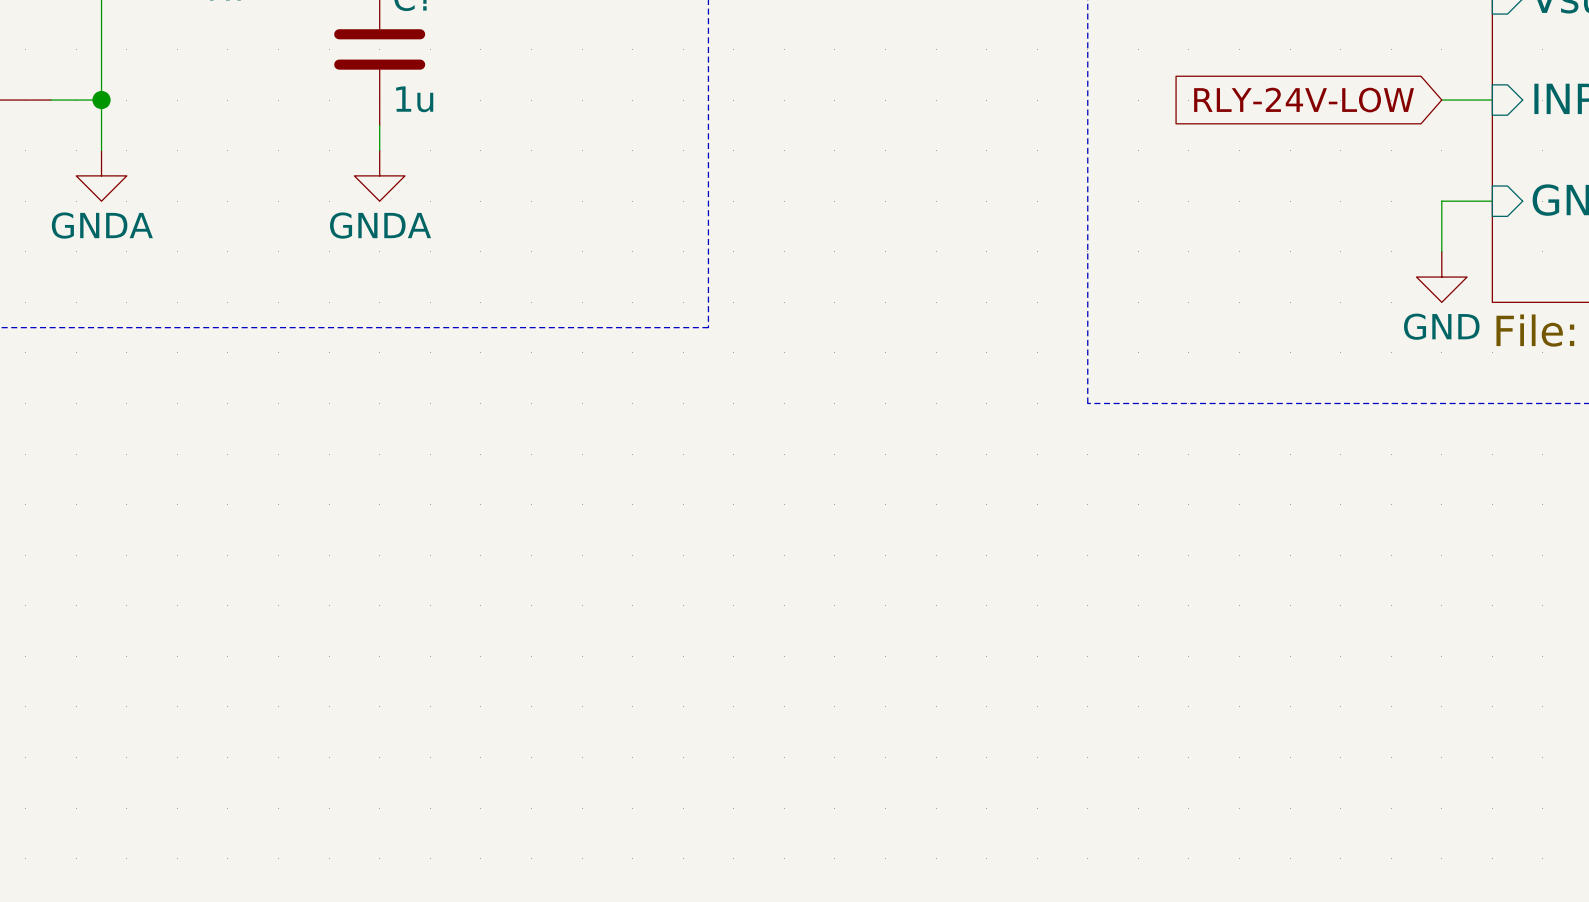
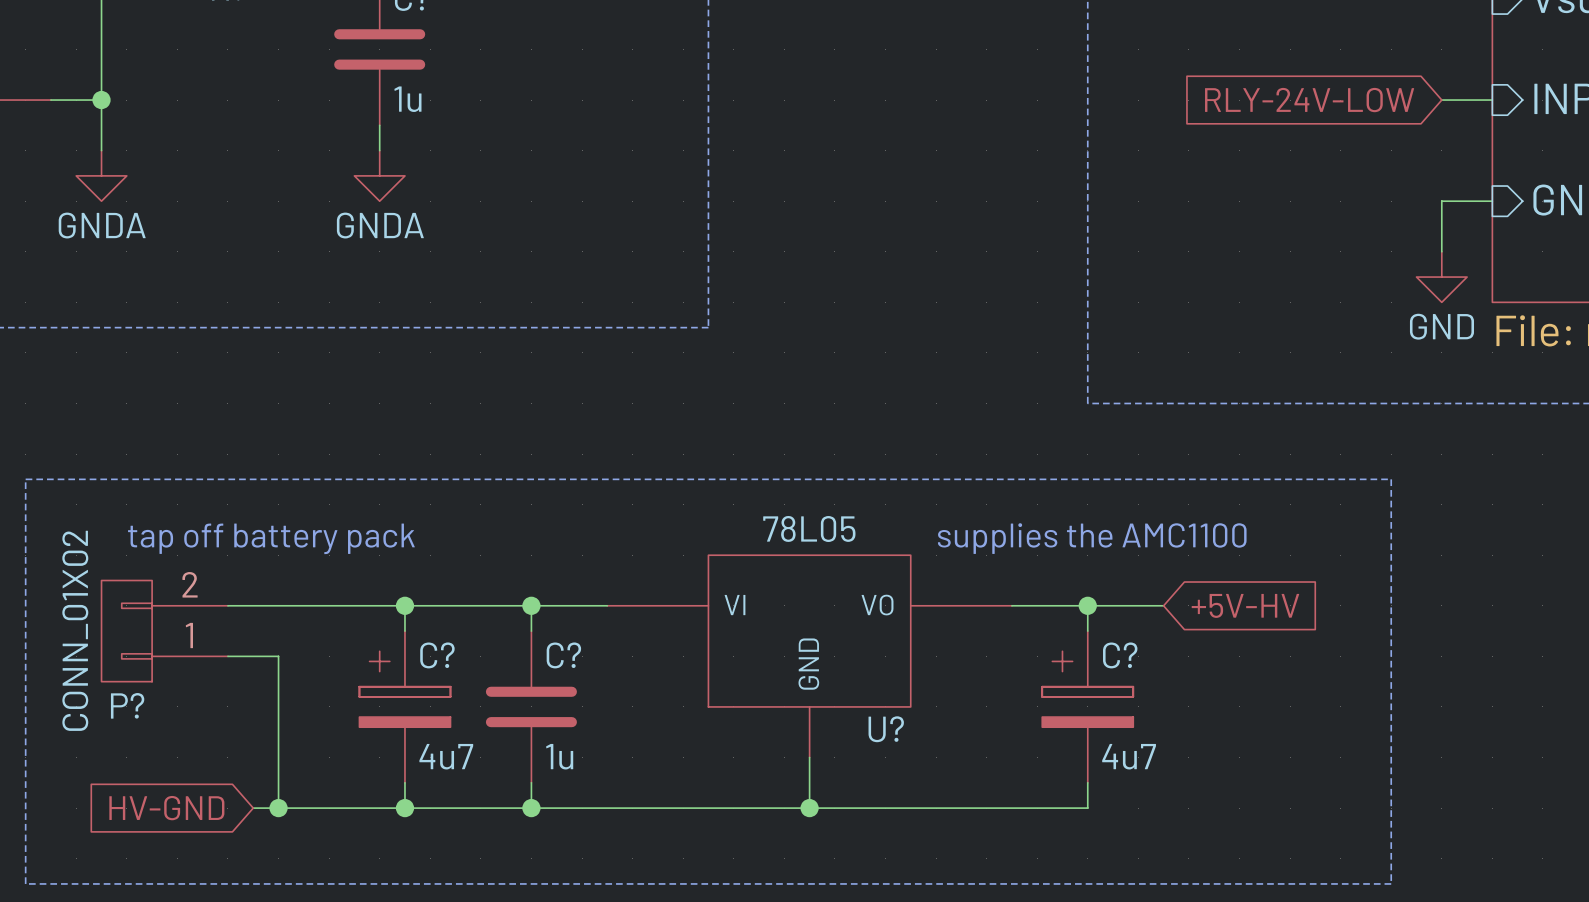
line: none -> (25, 479) (1391, 479) (1391, 883) (25, 883) (25, 479)
text: none -> tap off battery pack (271, 538)
text: none -> supplies the AMC1100 (1092, 538)
wire: none -> (227, 605) (607, 605)
wire: none -> (404, 605) (404, 631)
junction: none -> (404, 605)
wire: none -> (531, 605) (531, 631)
junction: none -> (531, 605)
wire: none -> (1011, 605) (1163, 605)
wire: none -> (1087, 605) (1087, 631)
junction: none -> (1087, 605)
global label: none -> +5V-HV (1245, 605)
P?: none -> CONN_01X02 (164, 631)
wire: none -> (227, 656) (278, 656) (278, 808)
U?: none -> 78L05 (809, 656)
C?: none -> 4u7 (404, 706)
C?: none -> 1u (531, 706)
C?: none -> 4u7 (1087, 706)
wire: none -> (809, 757) (809, 808)
wire: none -> (404, 782) (404, 808)
wire: none -> (531, 782) (531, 808)
wire: none -> (1087, 782) (1087, 808) (253, 808)
global label: none -> HV-GND (166, 808)
junction: none -> (278, 808)
junction: none -> (404, 808)
junction: none -> (531, 808)
junction: none -> (809, 808)

